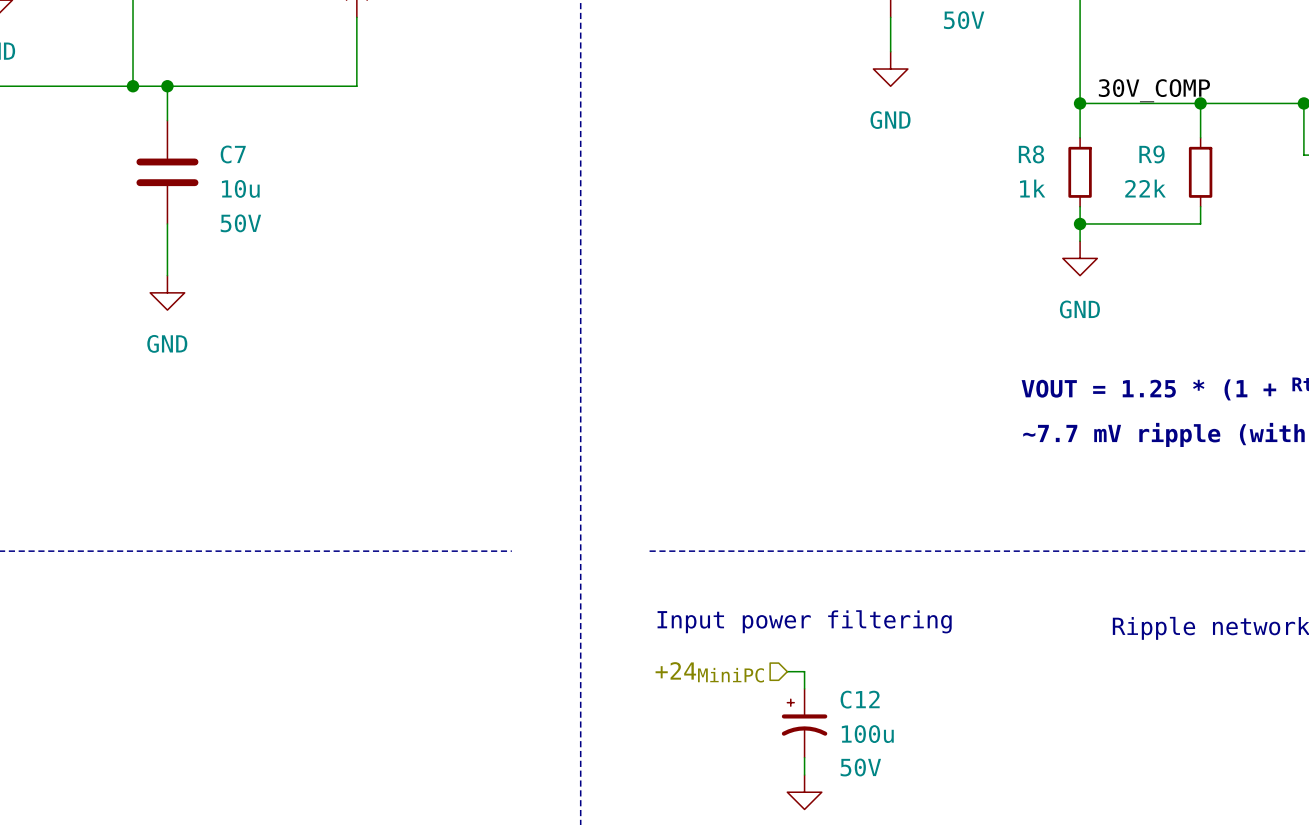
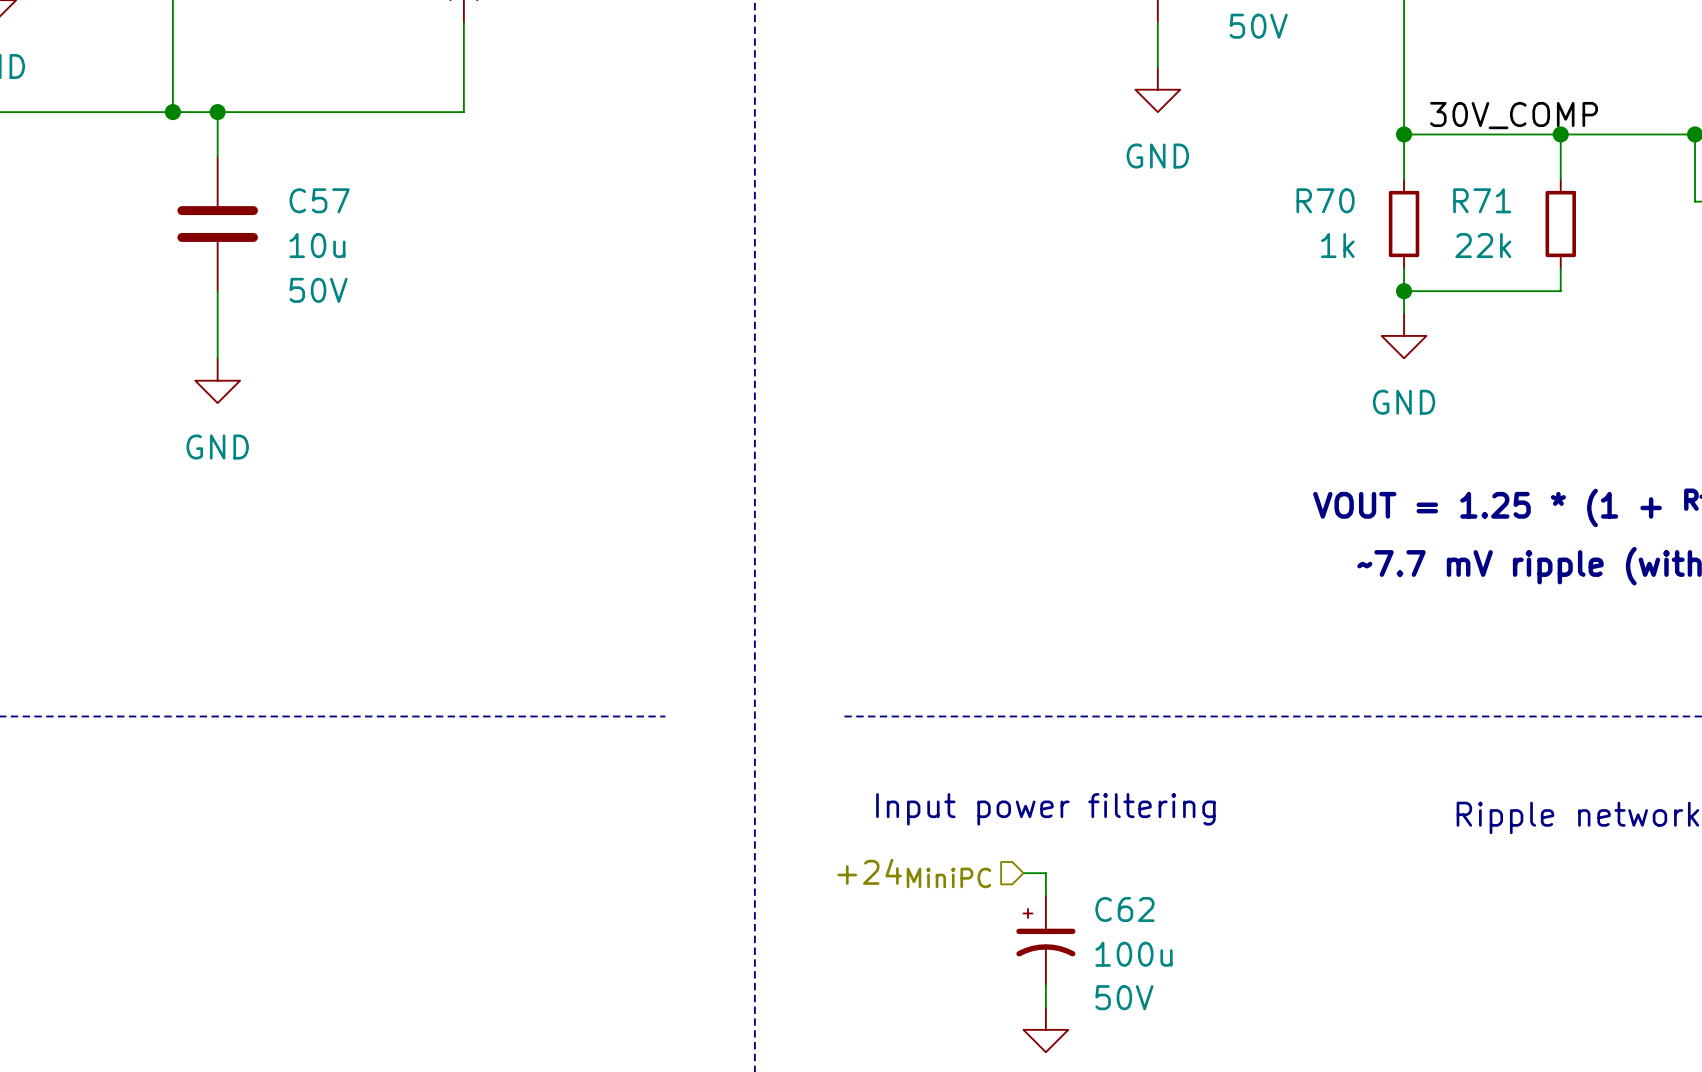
C7 name: C7 (233, 154) -> C57 (319, 200)
R8 name: R8 (1031, 154) -> R70 (1325, 200)
R9 name: R9 (1151, 154) -> R71 (1482, 200)
C12 name: C12 (860, 699) -> C62 (1124, 909)

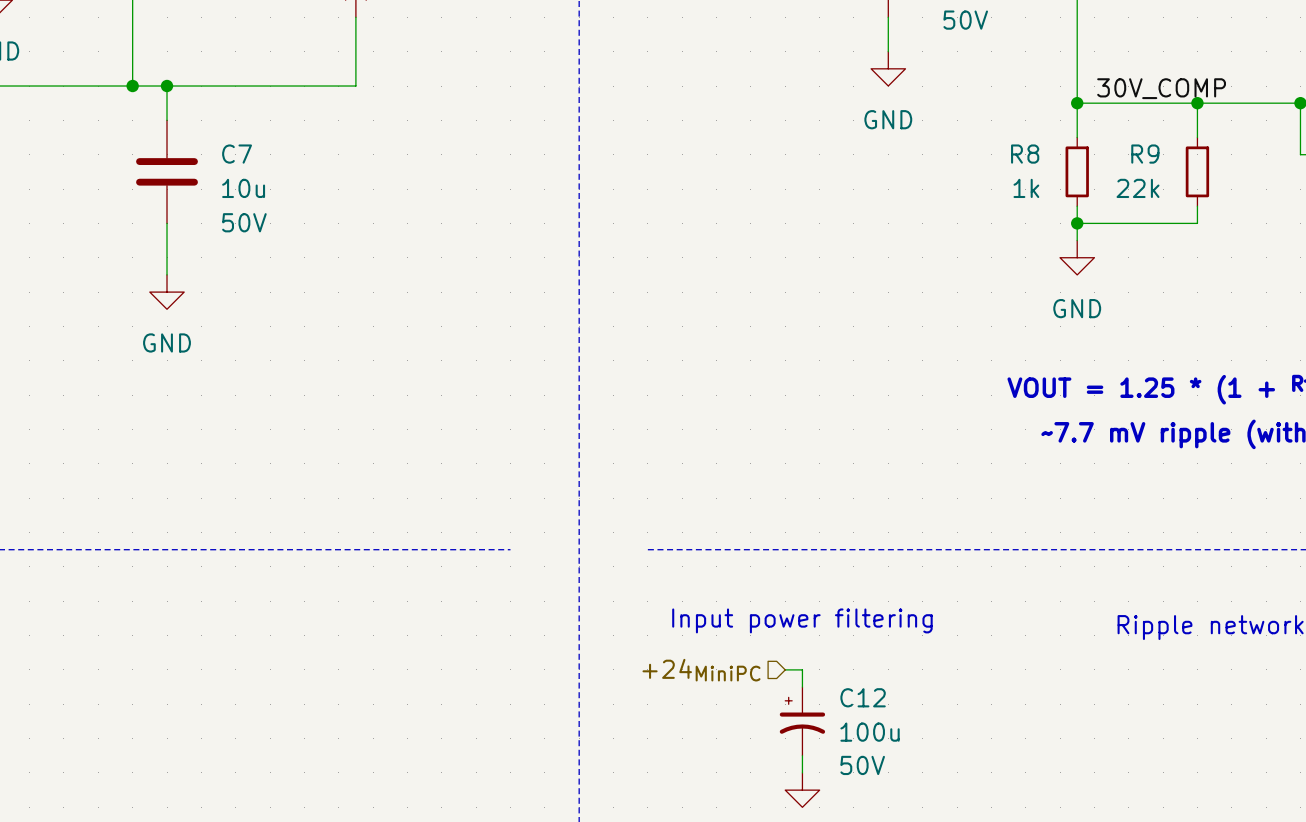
C57 name: C57 (319, 200) -> C7 (237, 154)
R70 name: R70 (1325, 200) -> R8 (1025, 154)
R71 name: R71 (1482, 200) -> R9 (1145, 154)
C62 name: C62 (1124, 909) -> C12 (863, 697)

